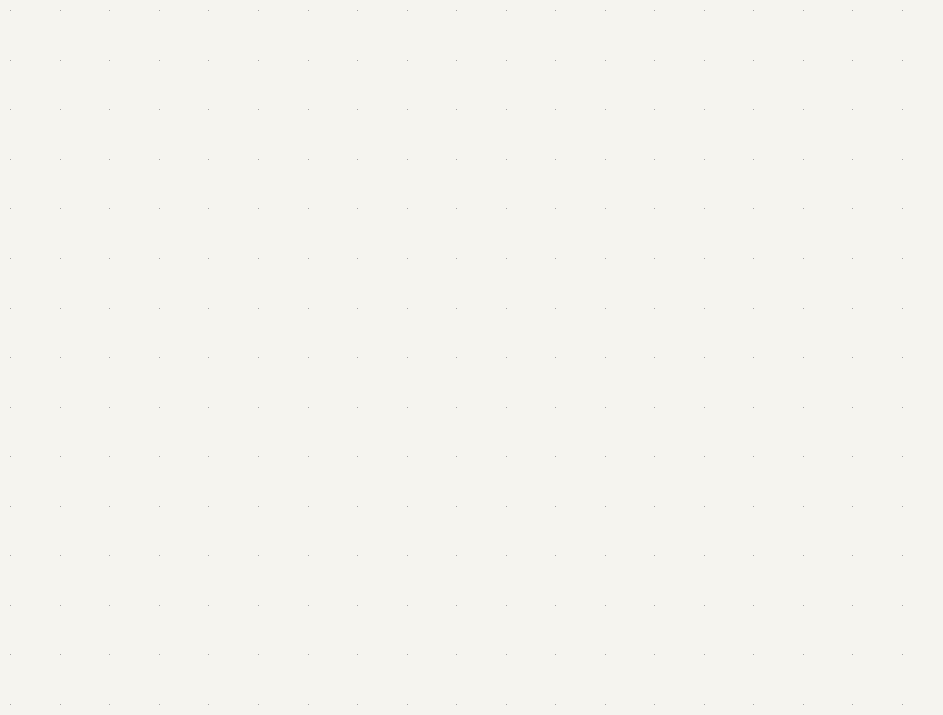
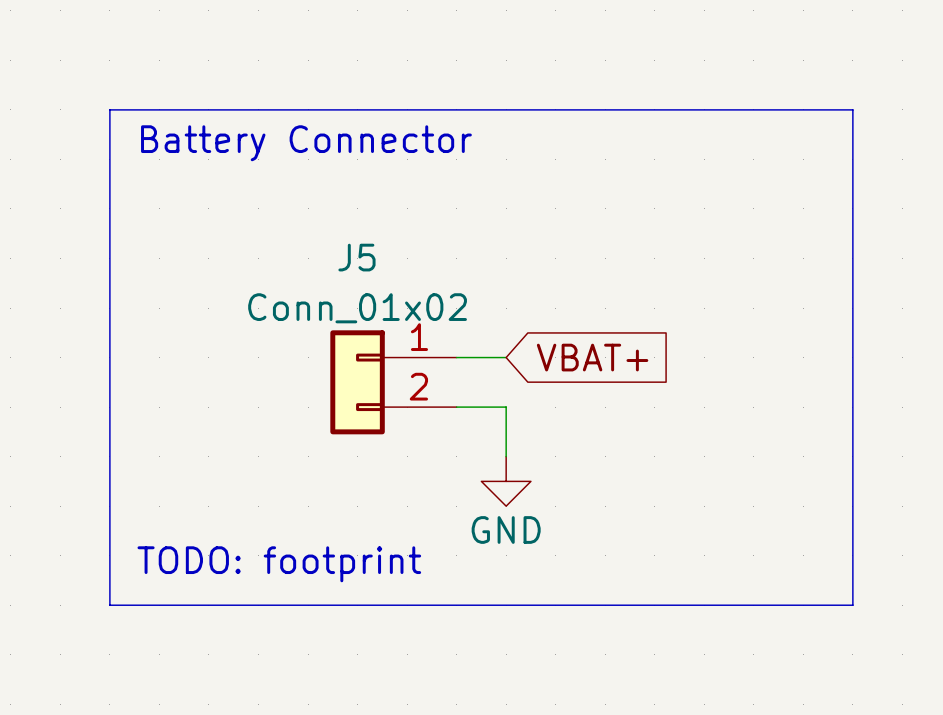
line: none -> (109, 109) (109, 605) (852, 605) (852, 109) (109, 109)
text: none -> Battery Connector (306, 143)
wire: none -> (456, 357) (506, 357)
global label: none -> VBAT+ (592, 357)
J5: none -> Conn_01x02 (393, 382)
wire: none -> (456, 407) (506, 407) (506, 456)
power symbol: none -> GND (506, 481)
text: none -> TODO: footprint (279, 564)

